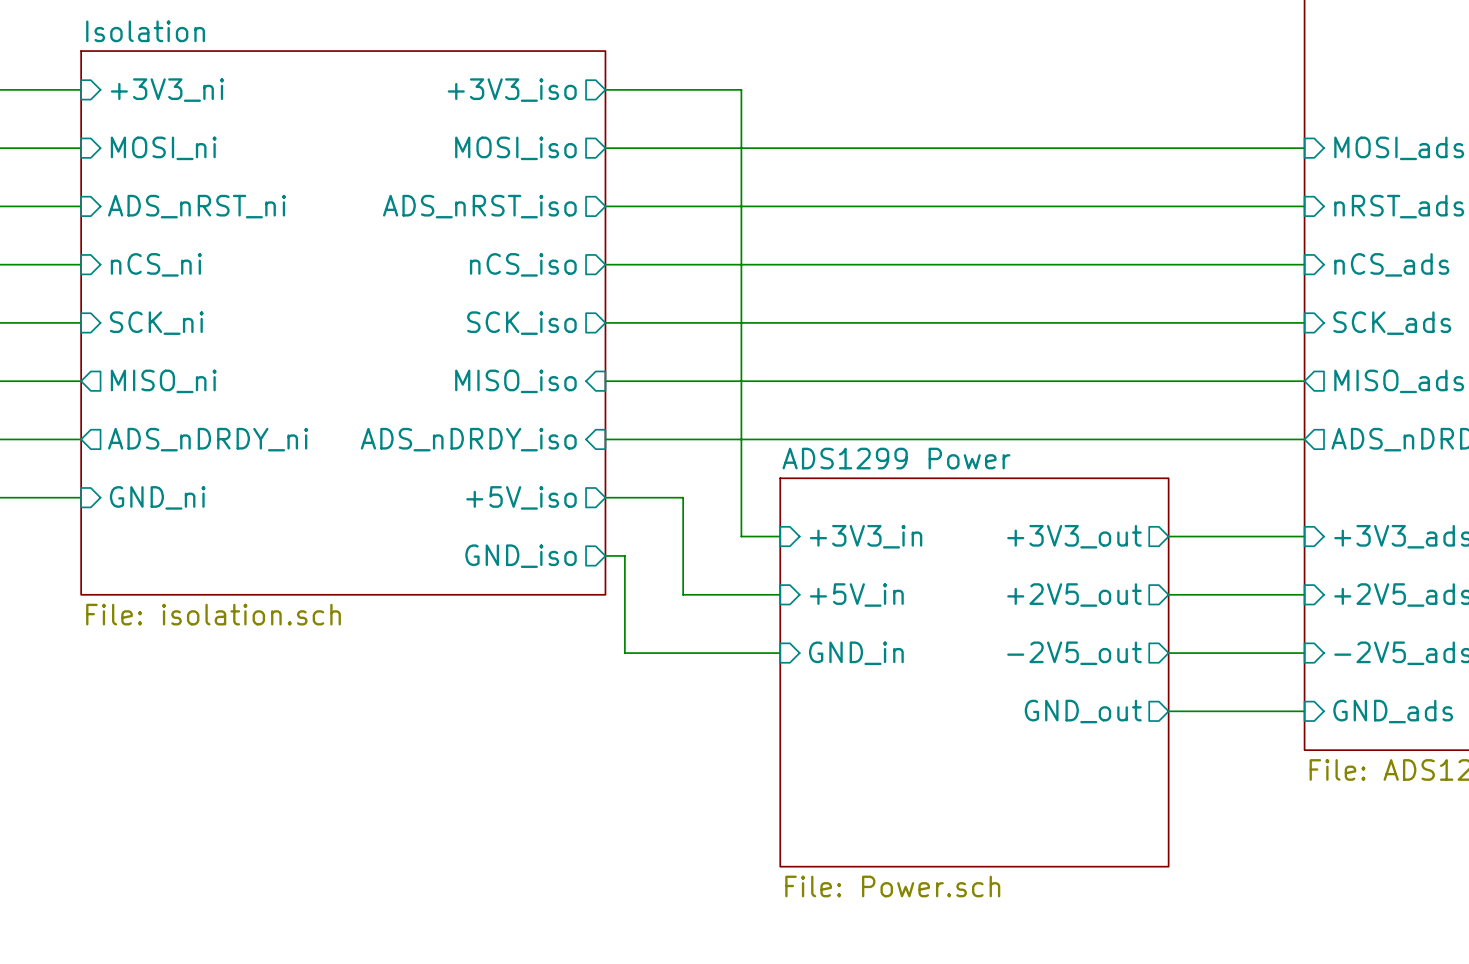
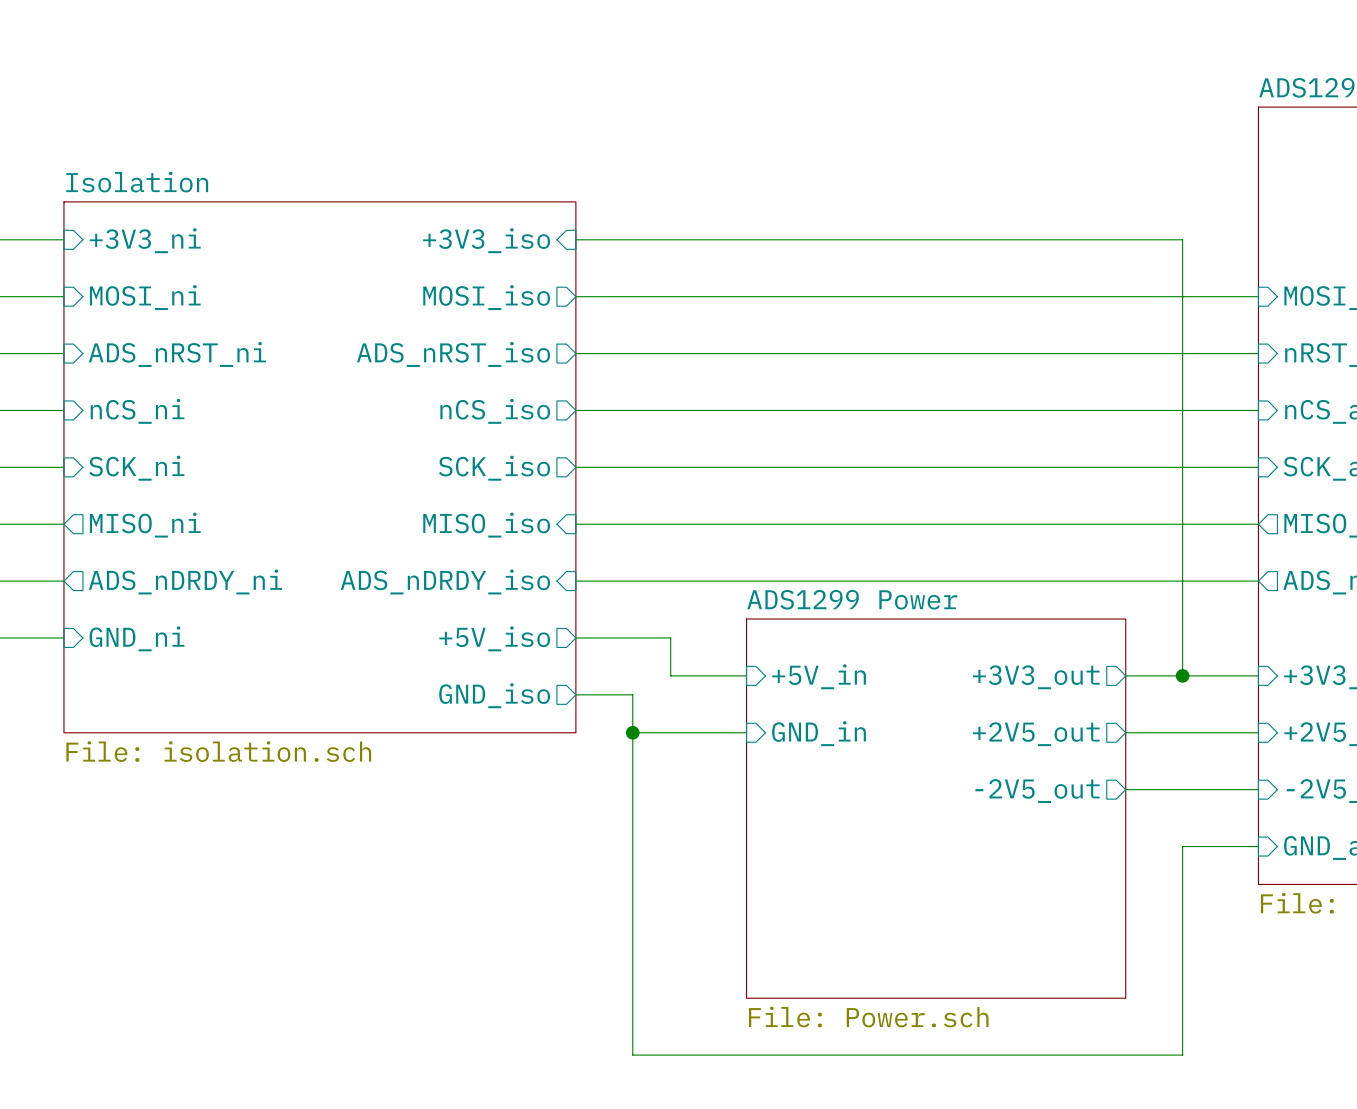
wire: (741, 89) (741, 536) -> (708, 239) (1182, 239) (1182, 675)
sheet pin shape: output (512, 90) -> input (486, 240)
wire: (683, 497) (683, 594) -> (651, 637) (670, 637) (670, 675) (708, 675)
sheet pin: +3V3_in (866, 536) -> +5V_in (819, 676)
junction: none -> (1182, 675)
wire: (624, 555) (624, 653) (780, 653) -> (594, 694) (632, 694) (632, 1055) (1182, 1055) (1182, 846)
wire: none -> (632, 732) (651, 732)
junction: none -> (632, 732)
sheet pin: +5V_in (856, 595) -> GND_in (819, 733)
sheet pin: GND_in (856, 653) -> none
sheet pin: GND_out (1083, 711) -> none
wire: (1168, 711) (1226, 711) -> none

